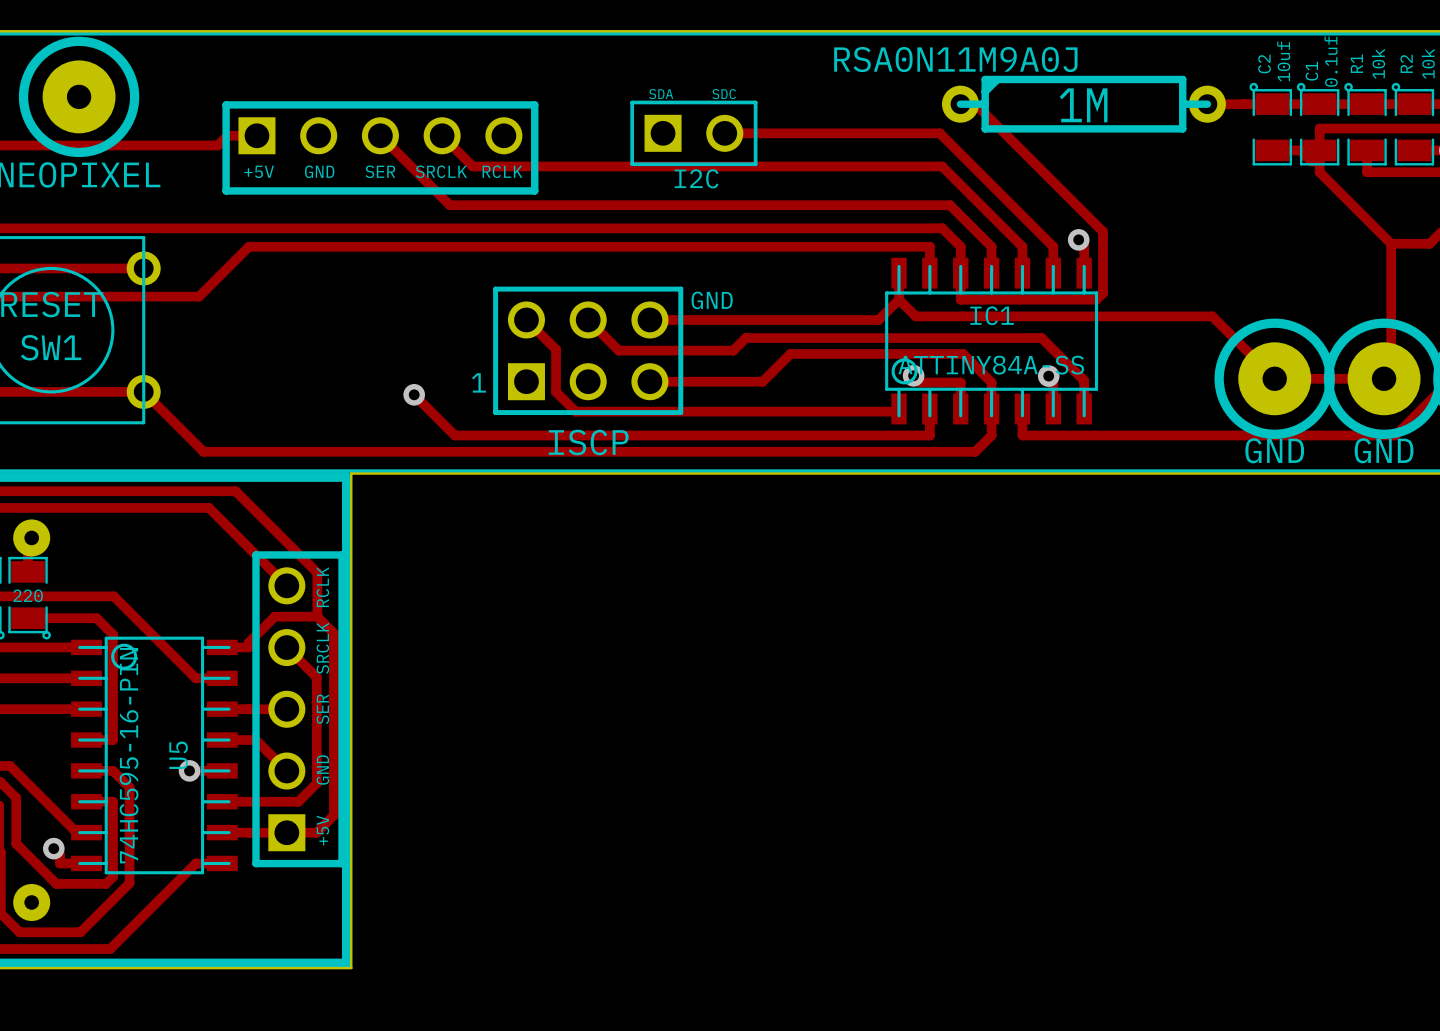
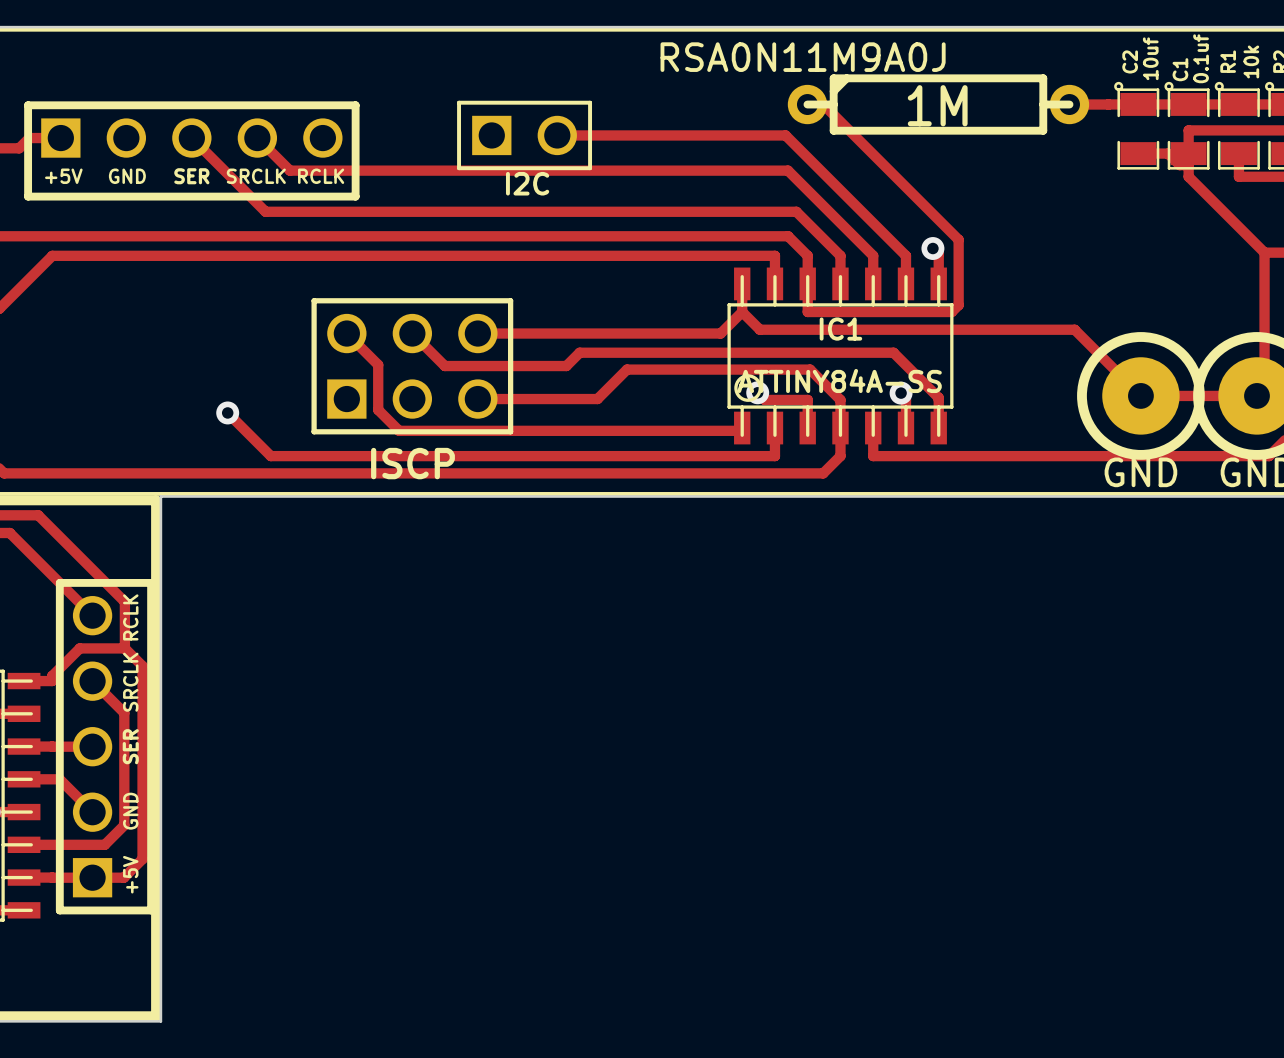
text: SDA (661, 94) -> none
text: SDC (724, 94) -> none
text: GND (712, 300) -> none
text: 1 (478, 382) -> none

